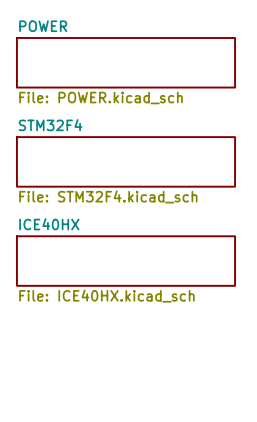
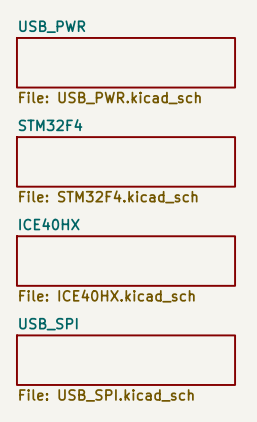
sheet POWER name: POWER (43, 26) -> USB_PWR (52, 26)
sheet POWER value: File: POWER.kicad_sch (101, 98) -> File: USB_PWR.kicad_sch (110, 98)
sheet USB_SPI: none -> File: USB_SPI.kicad_sch (126, 360)

